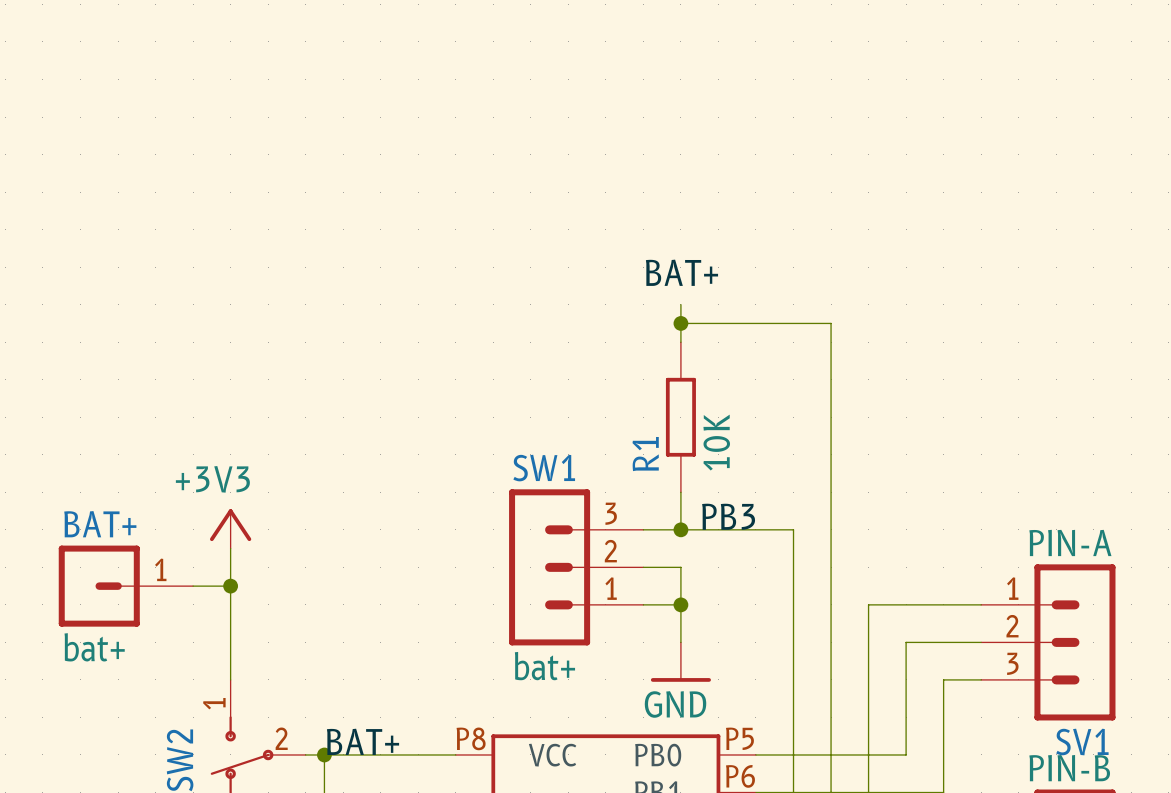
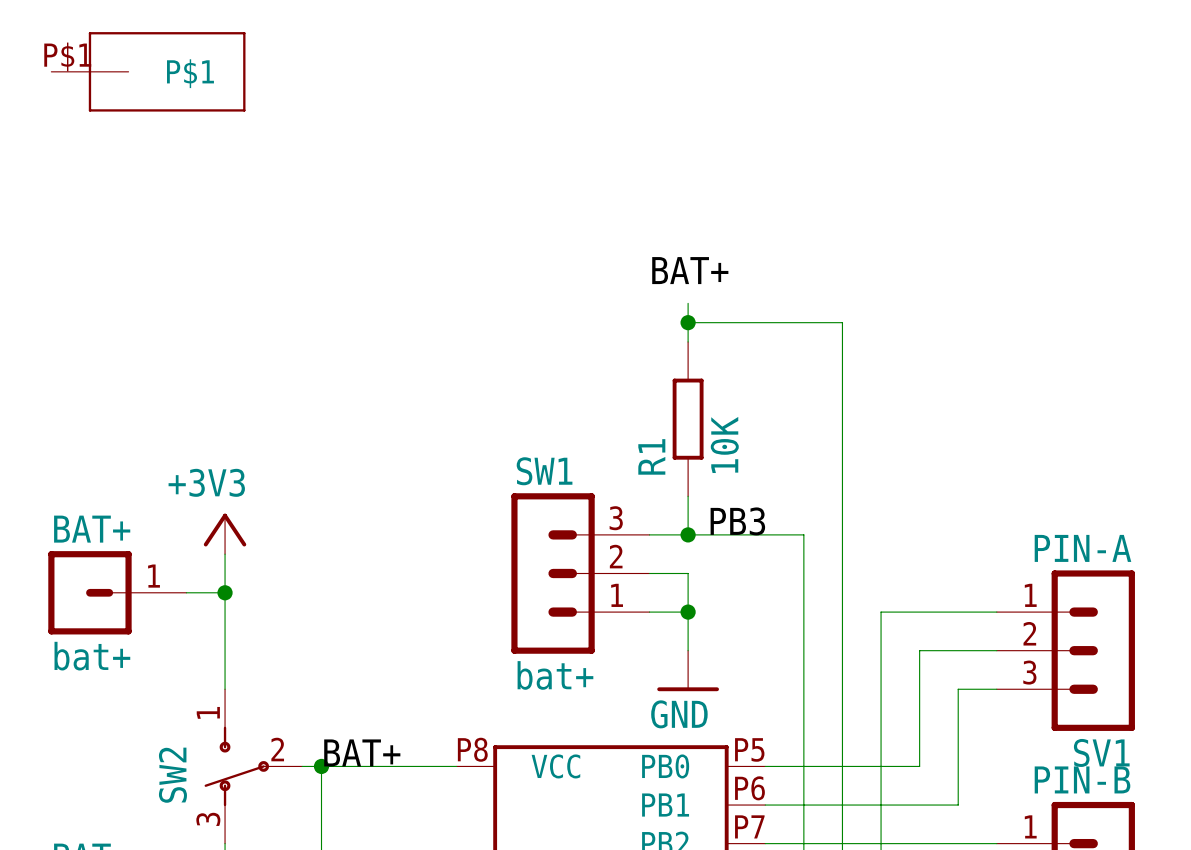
part: none -> (148, 71)

